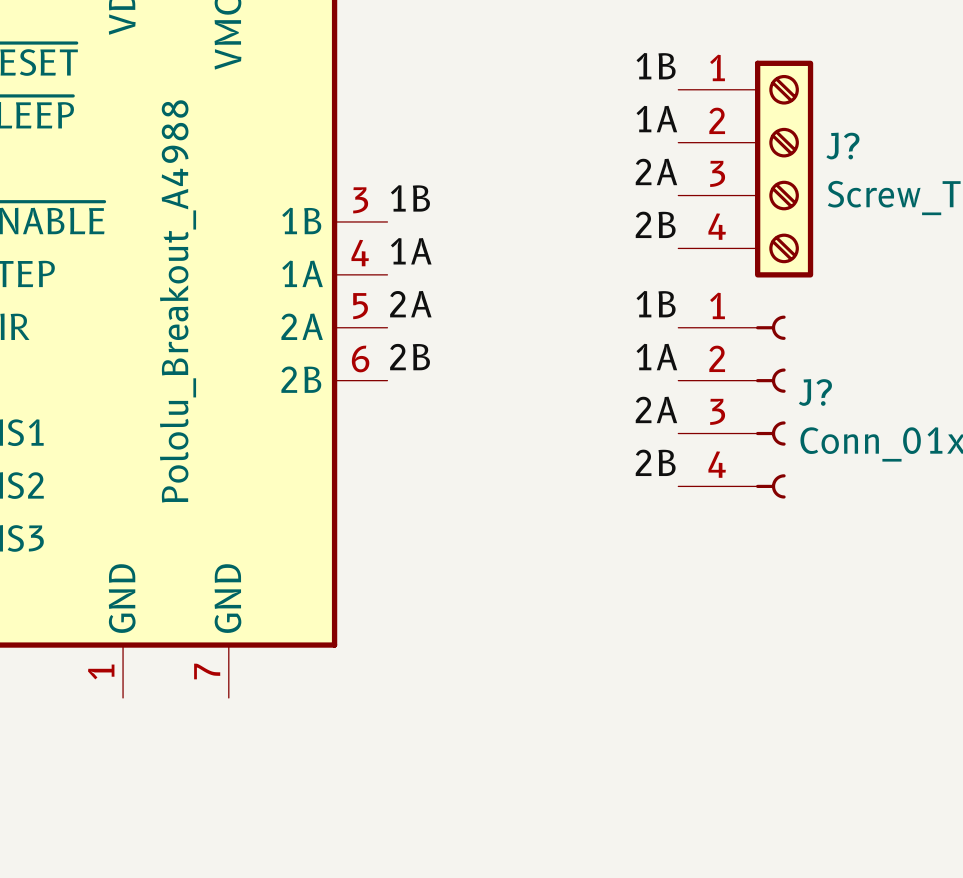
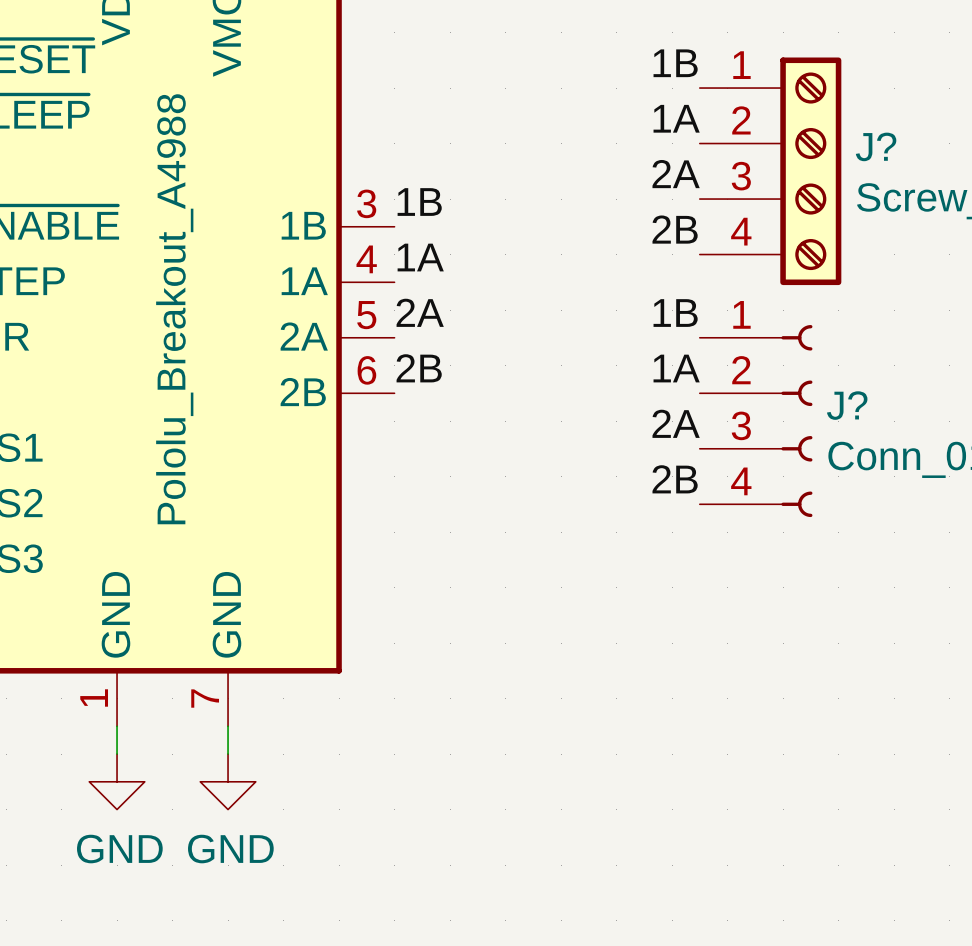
wire: none -> (117, 726) (117, 754)
wire: none -> (228, 726) (228, 754)
power symbol: none -> GND (117, 781)
power symbol: none -> GND (228, 781)

